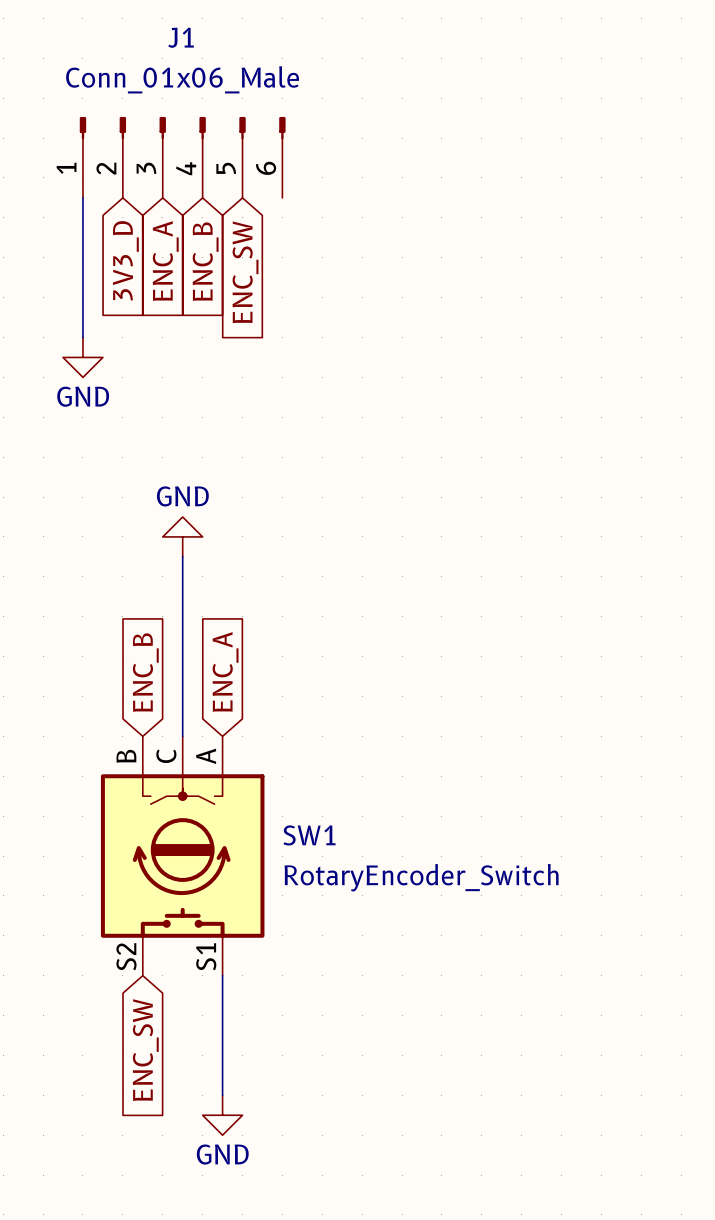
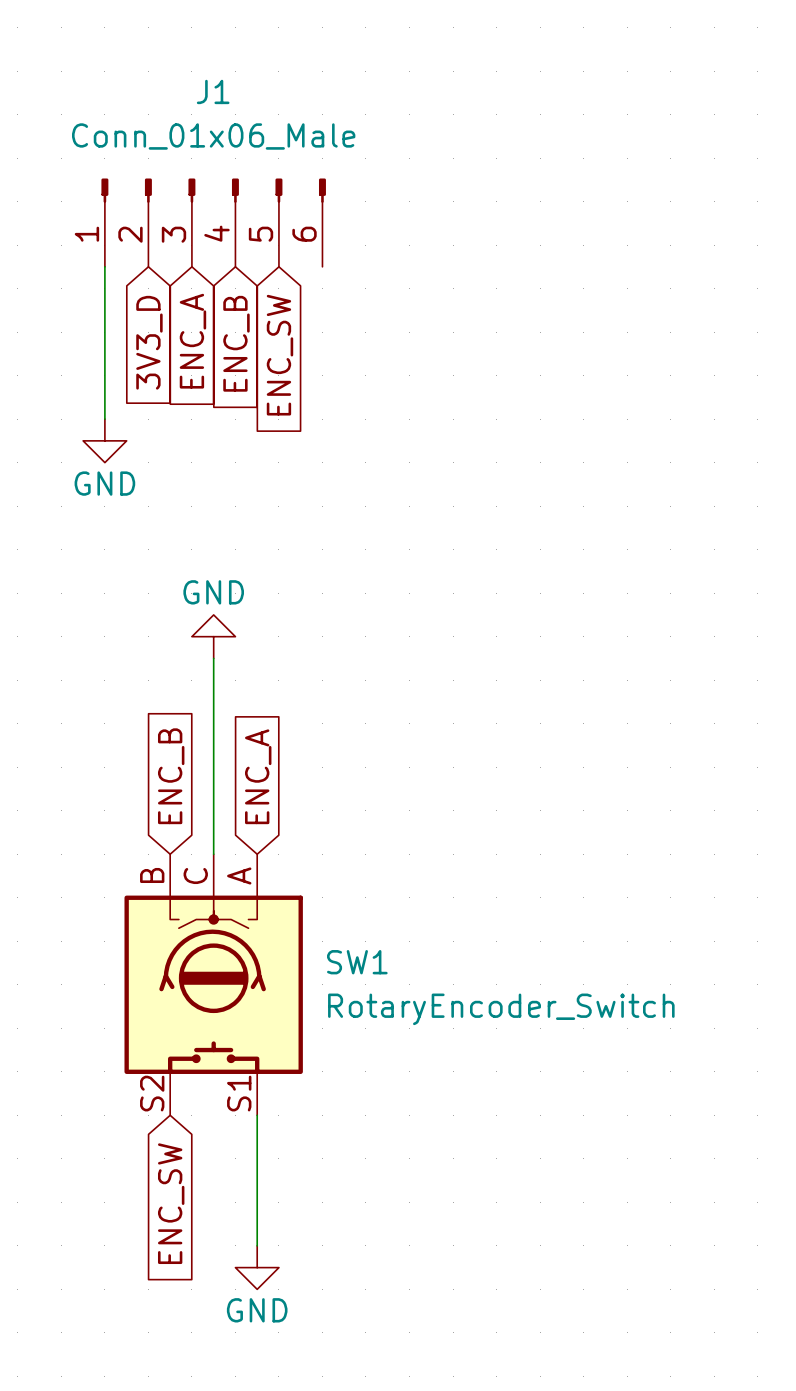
SW1 symbol: [100, 736, 265, 976] -> [124, 854, 303, 1116]

